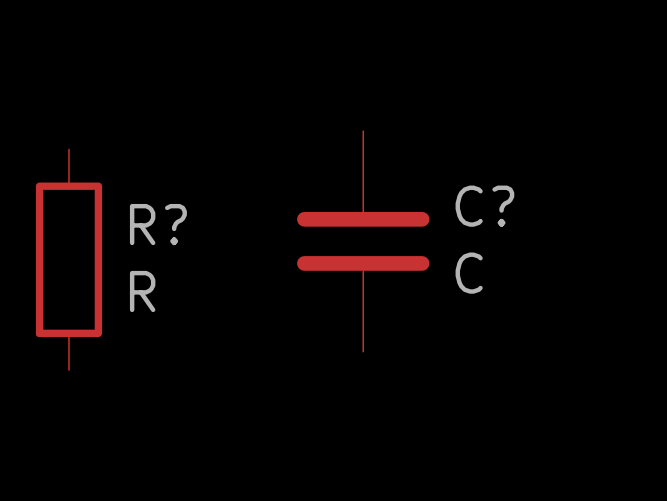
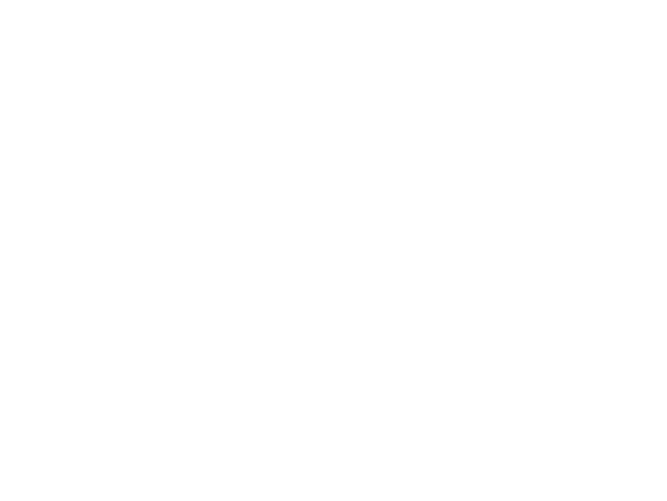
C?: C (363, 241) -> none
R?: R (68, 259) -> none

